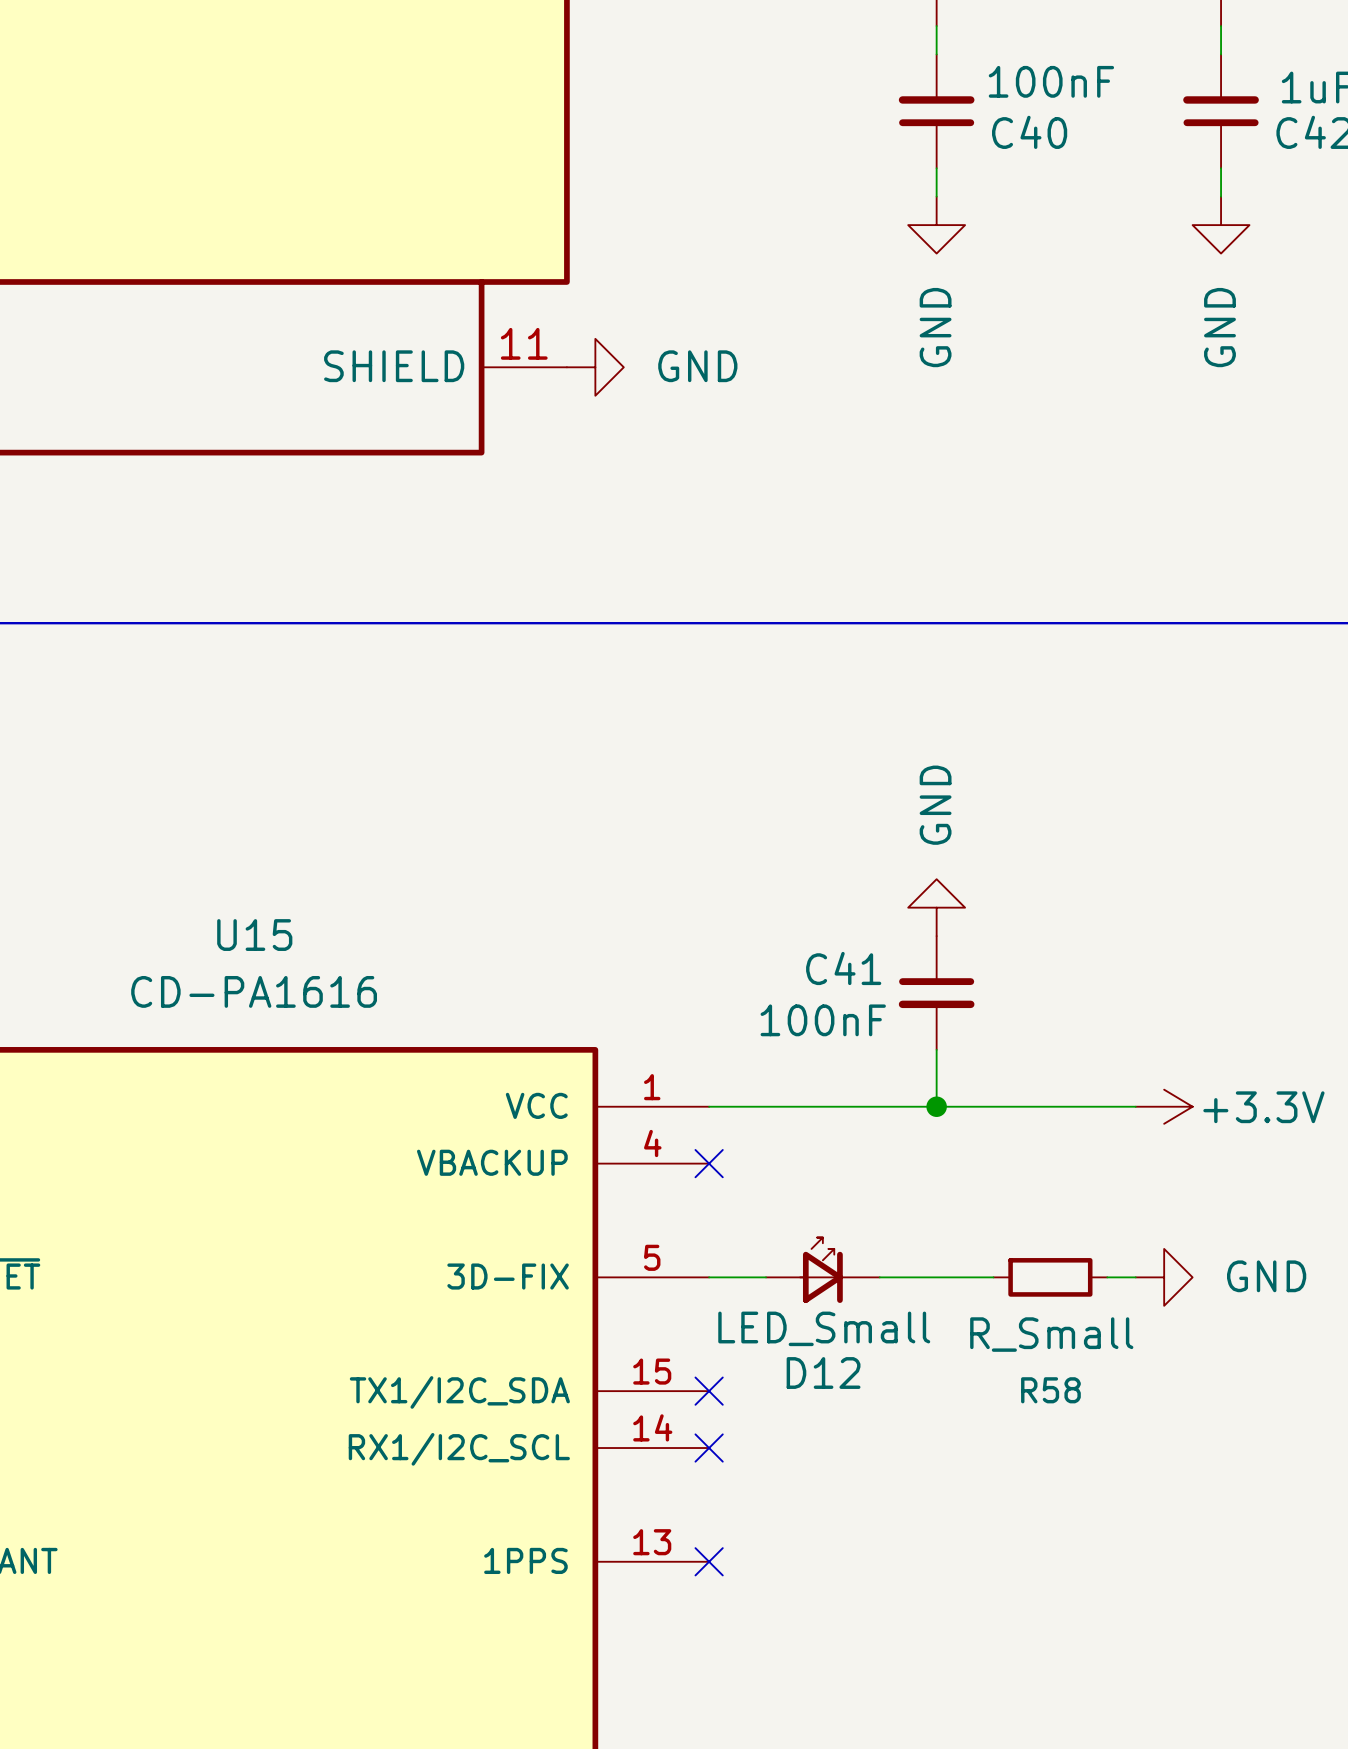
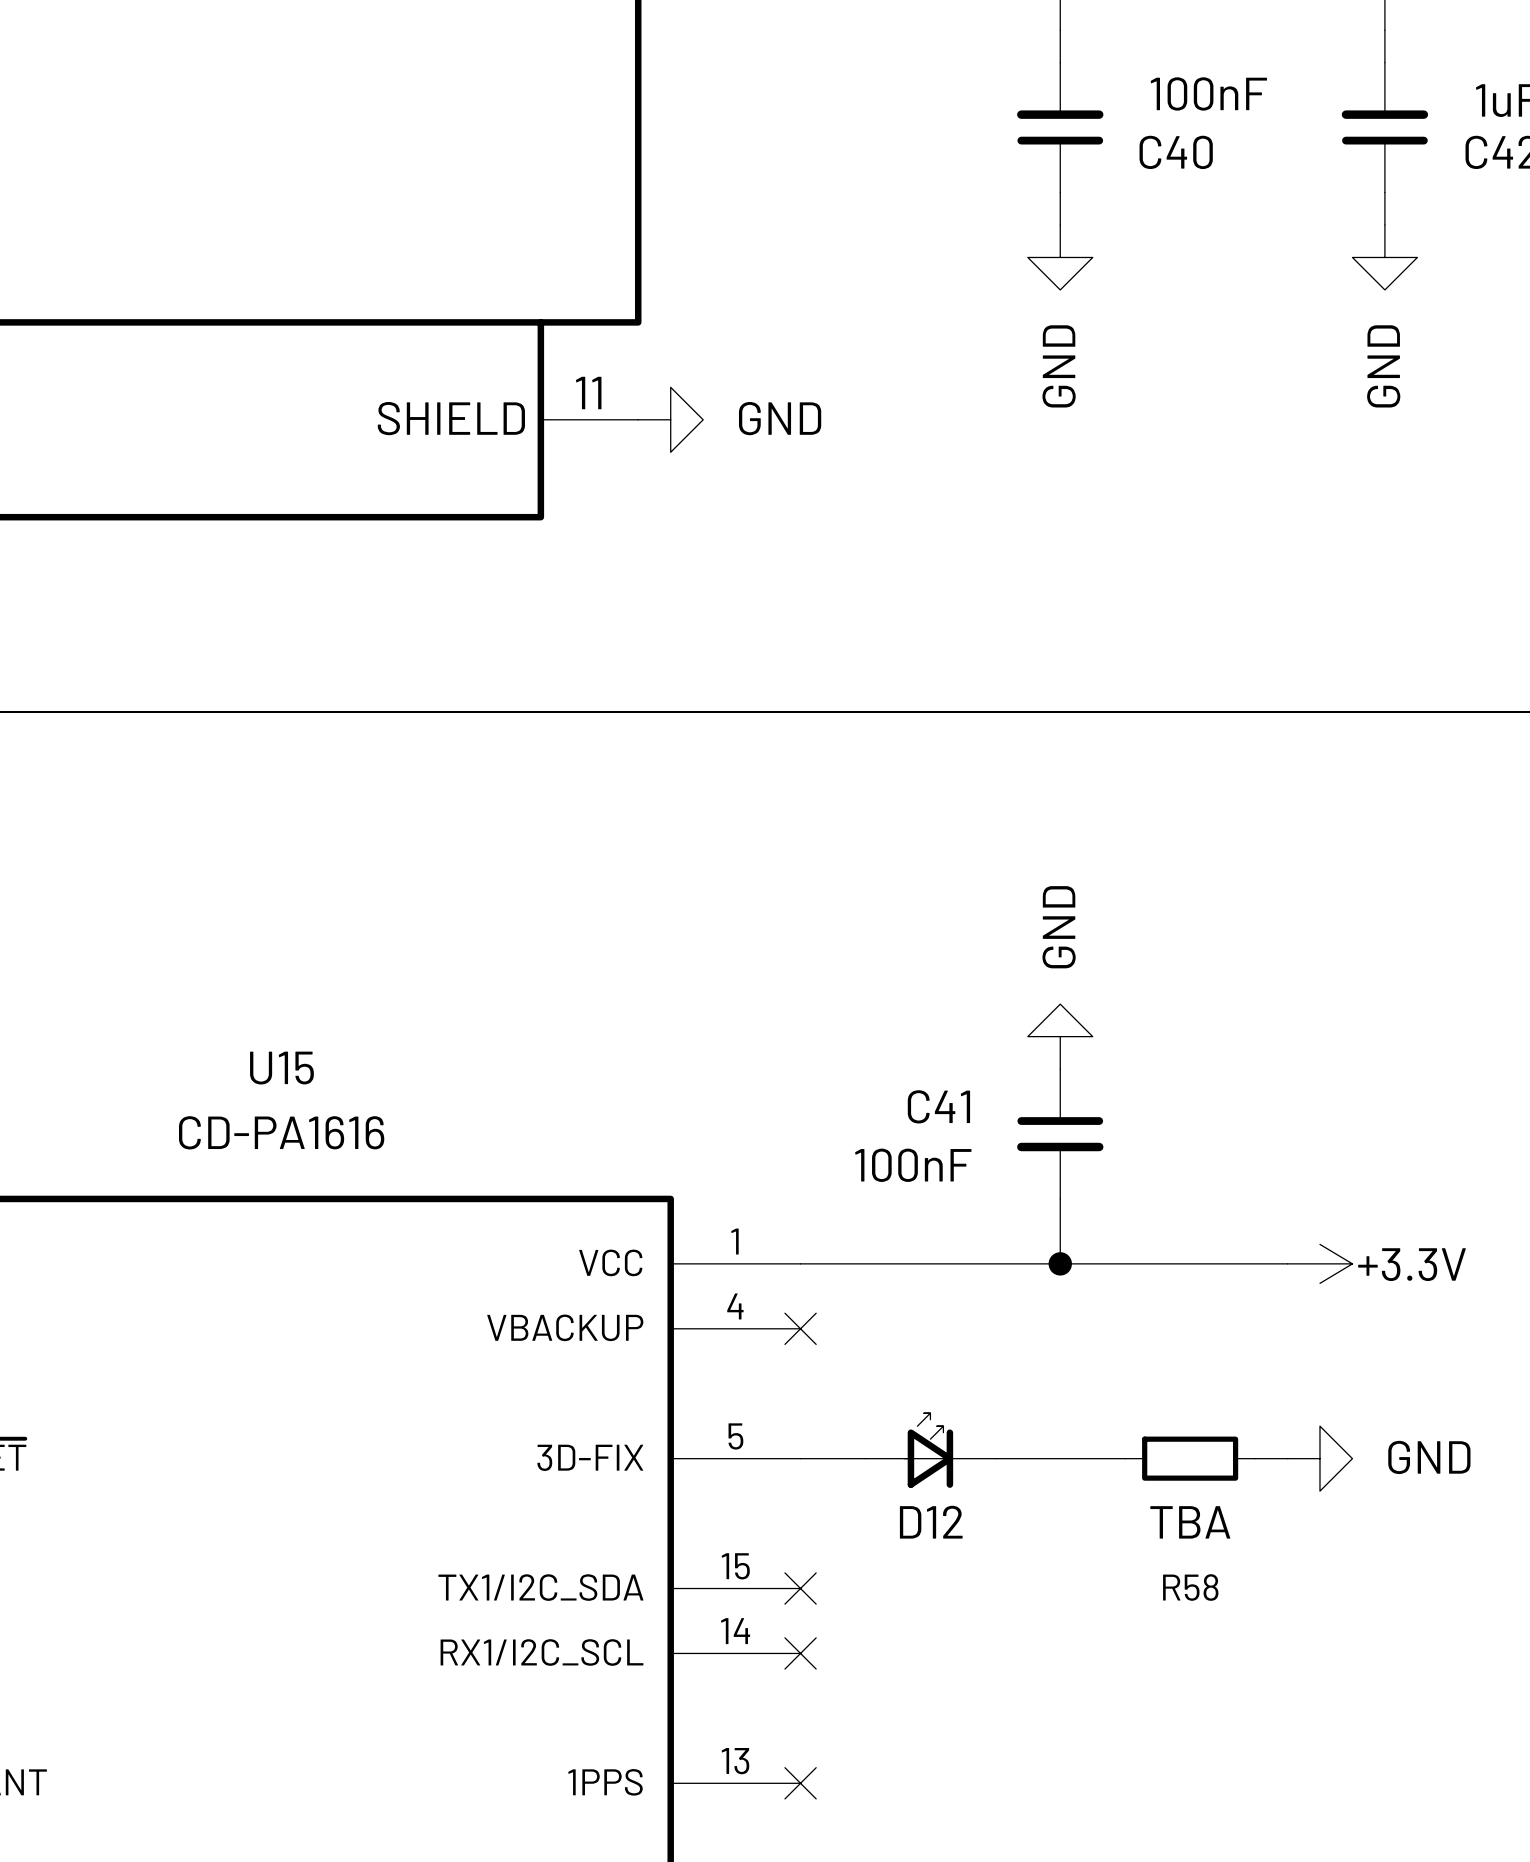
D12 value: LED_Small (824, 1328) -> none
R58 value: R_Small (1051, 1334) -> TBA (1190, 1522)
D12 name position: D12 (823, 1373) -> D12 (931, 1522)

